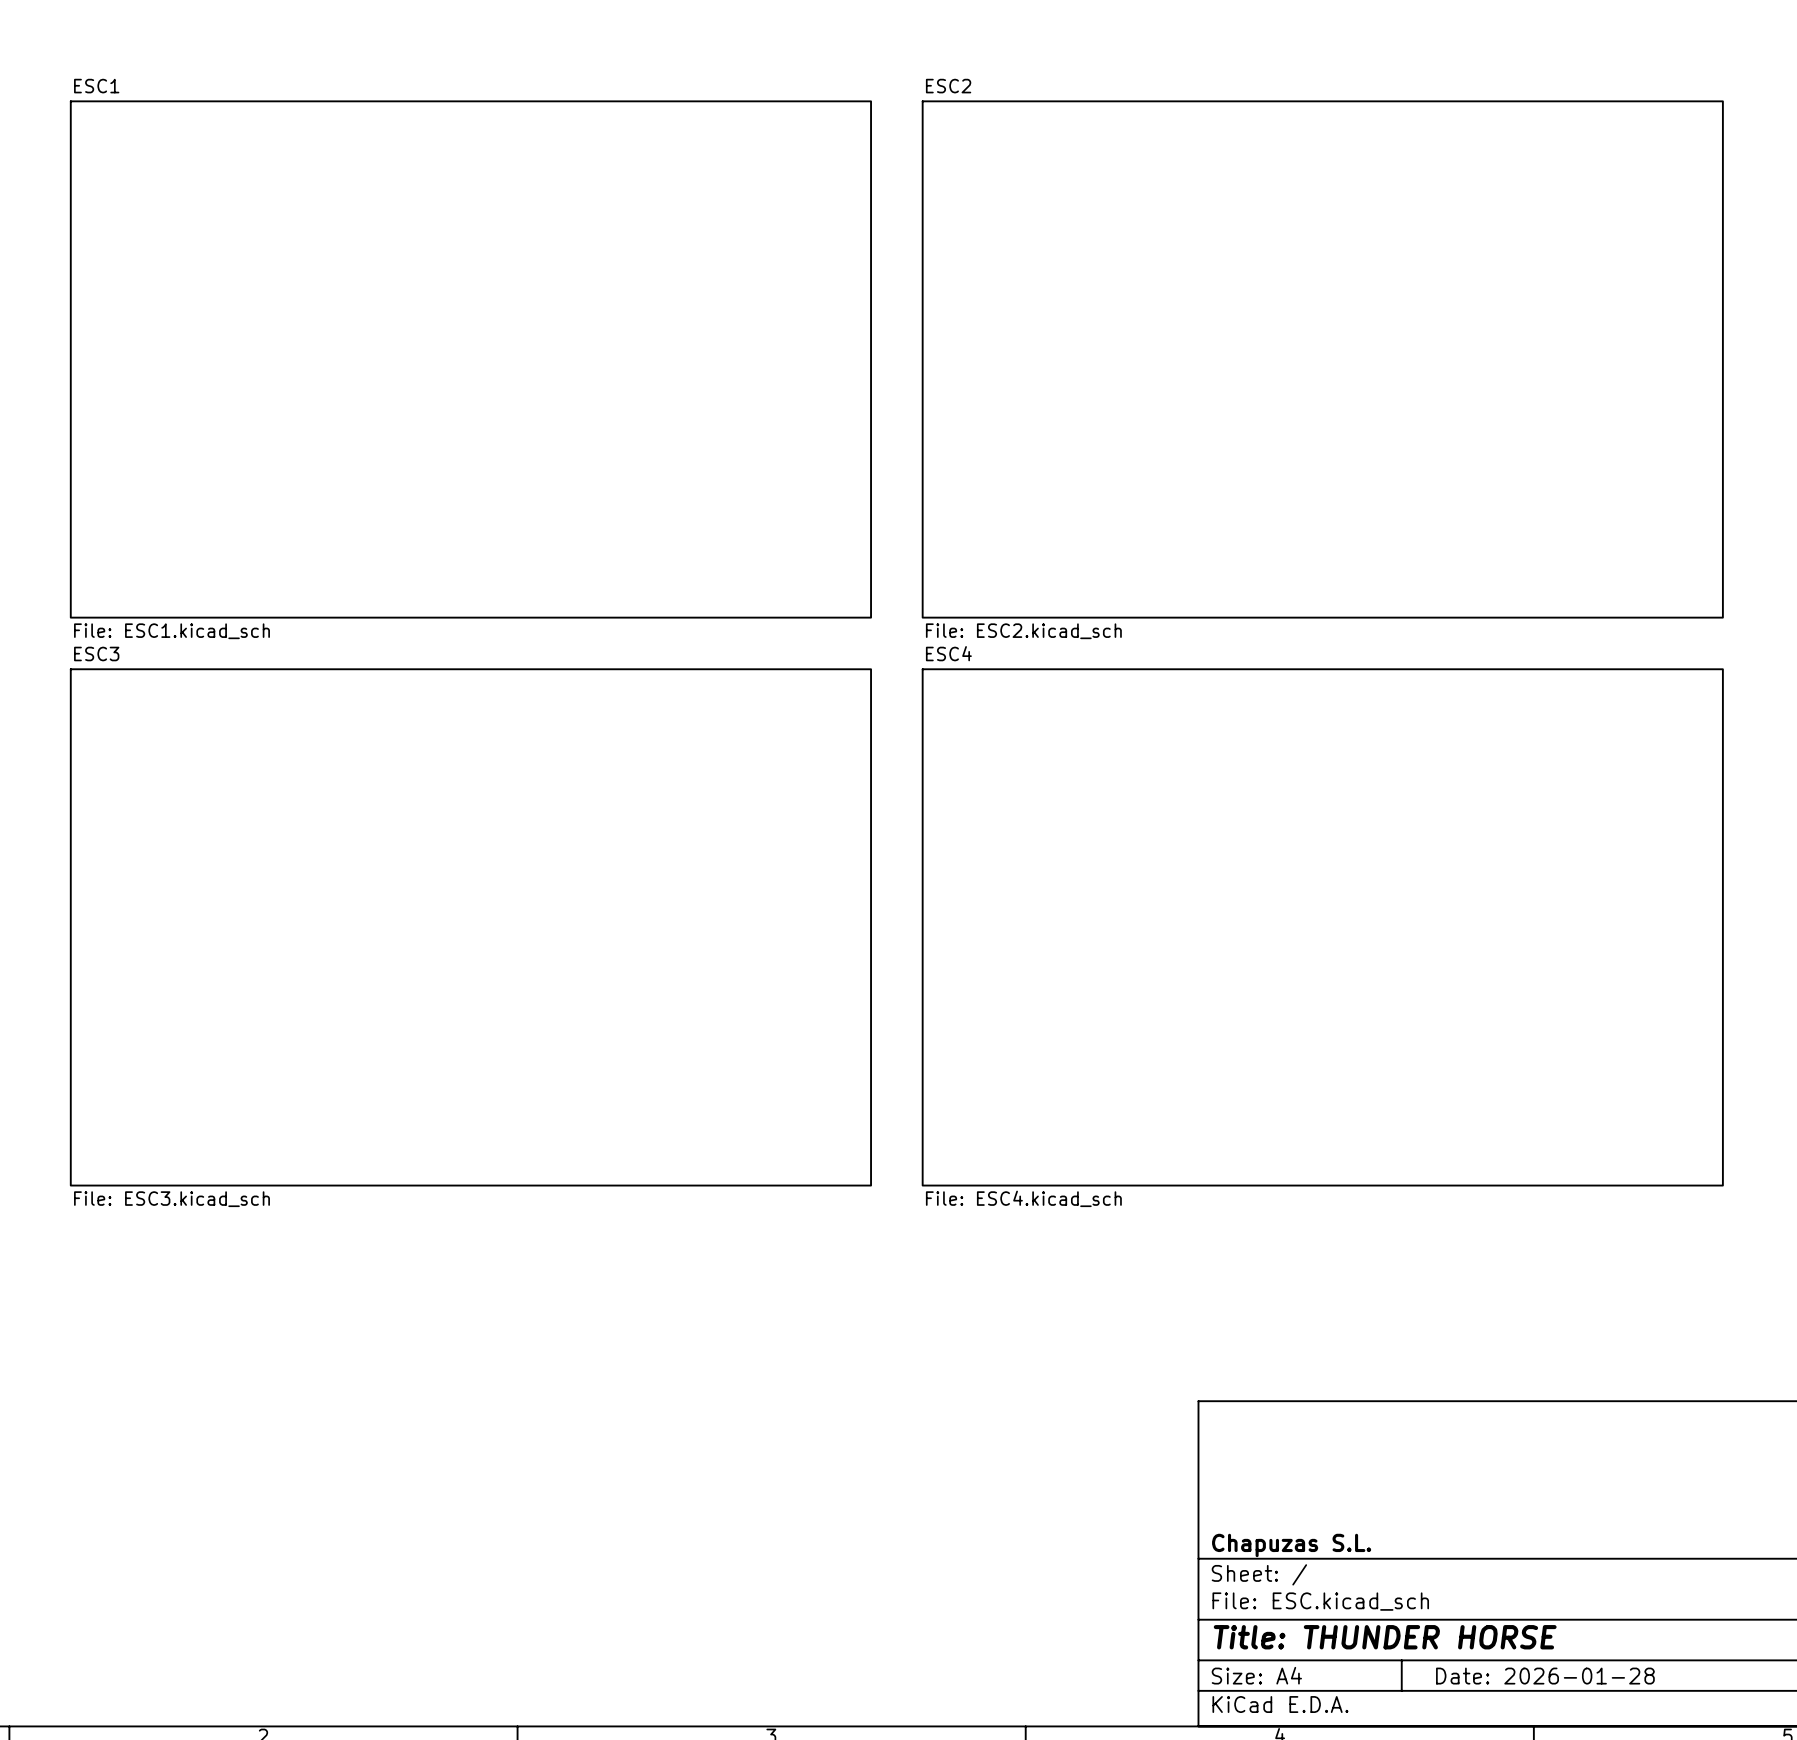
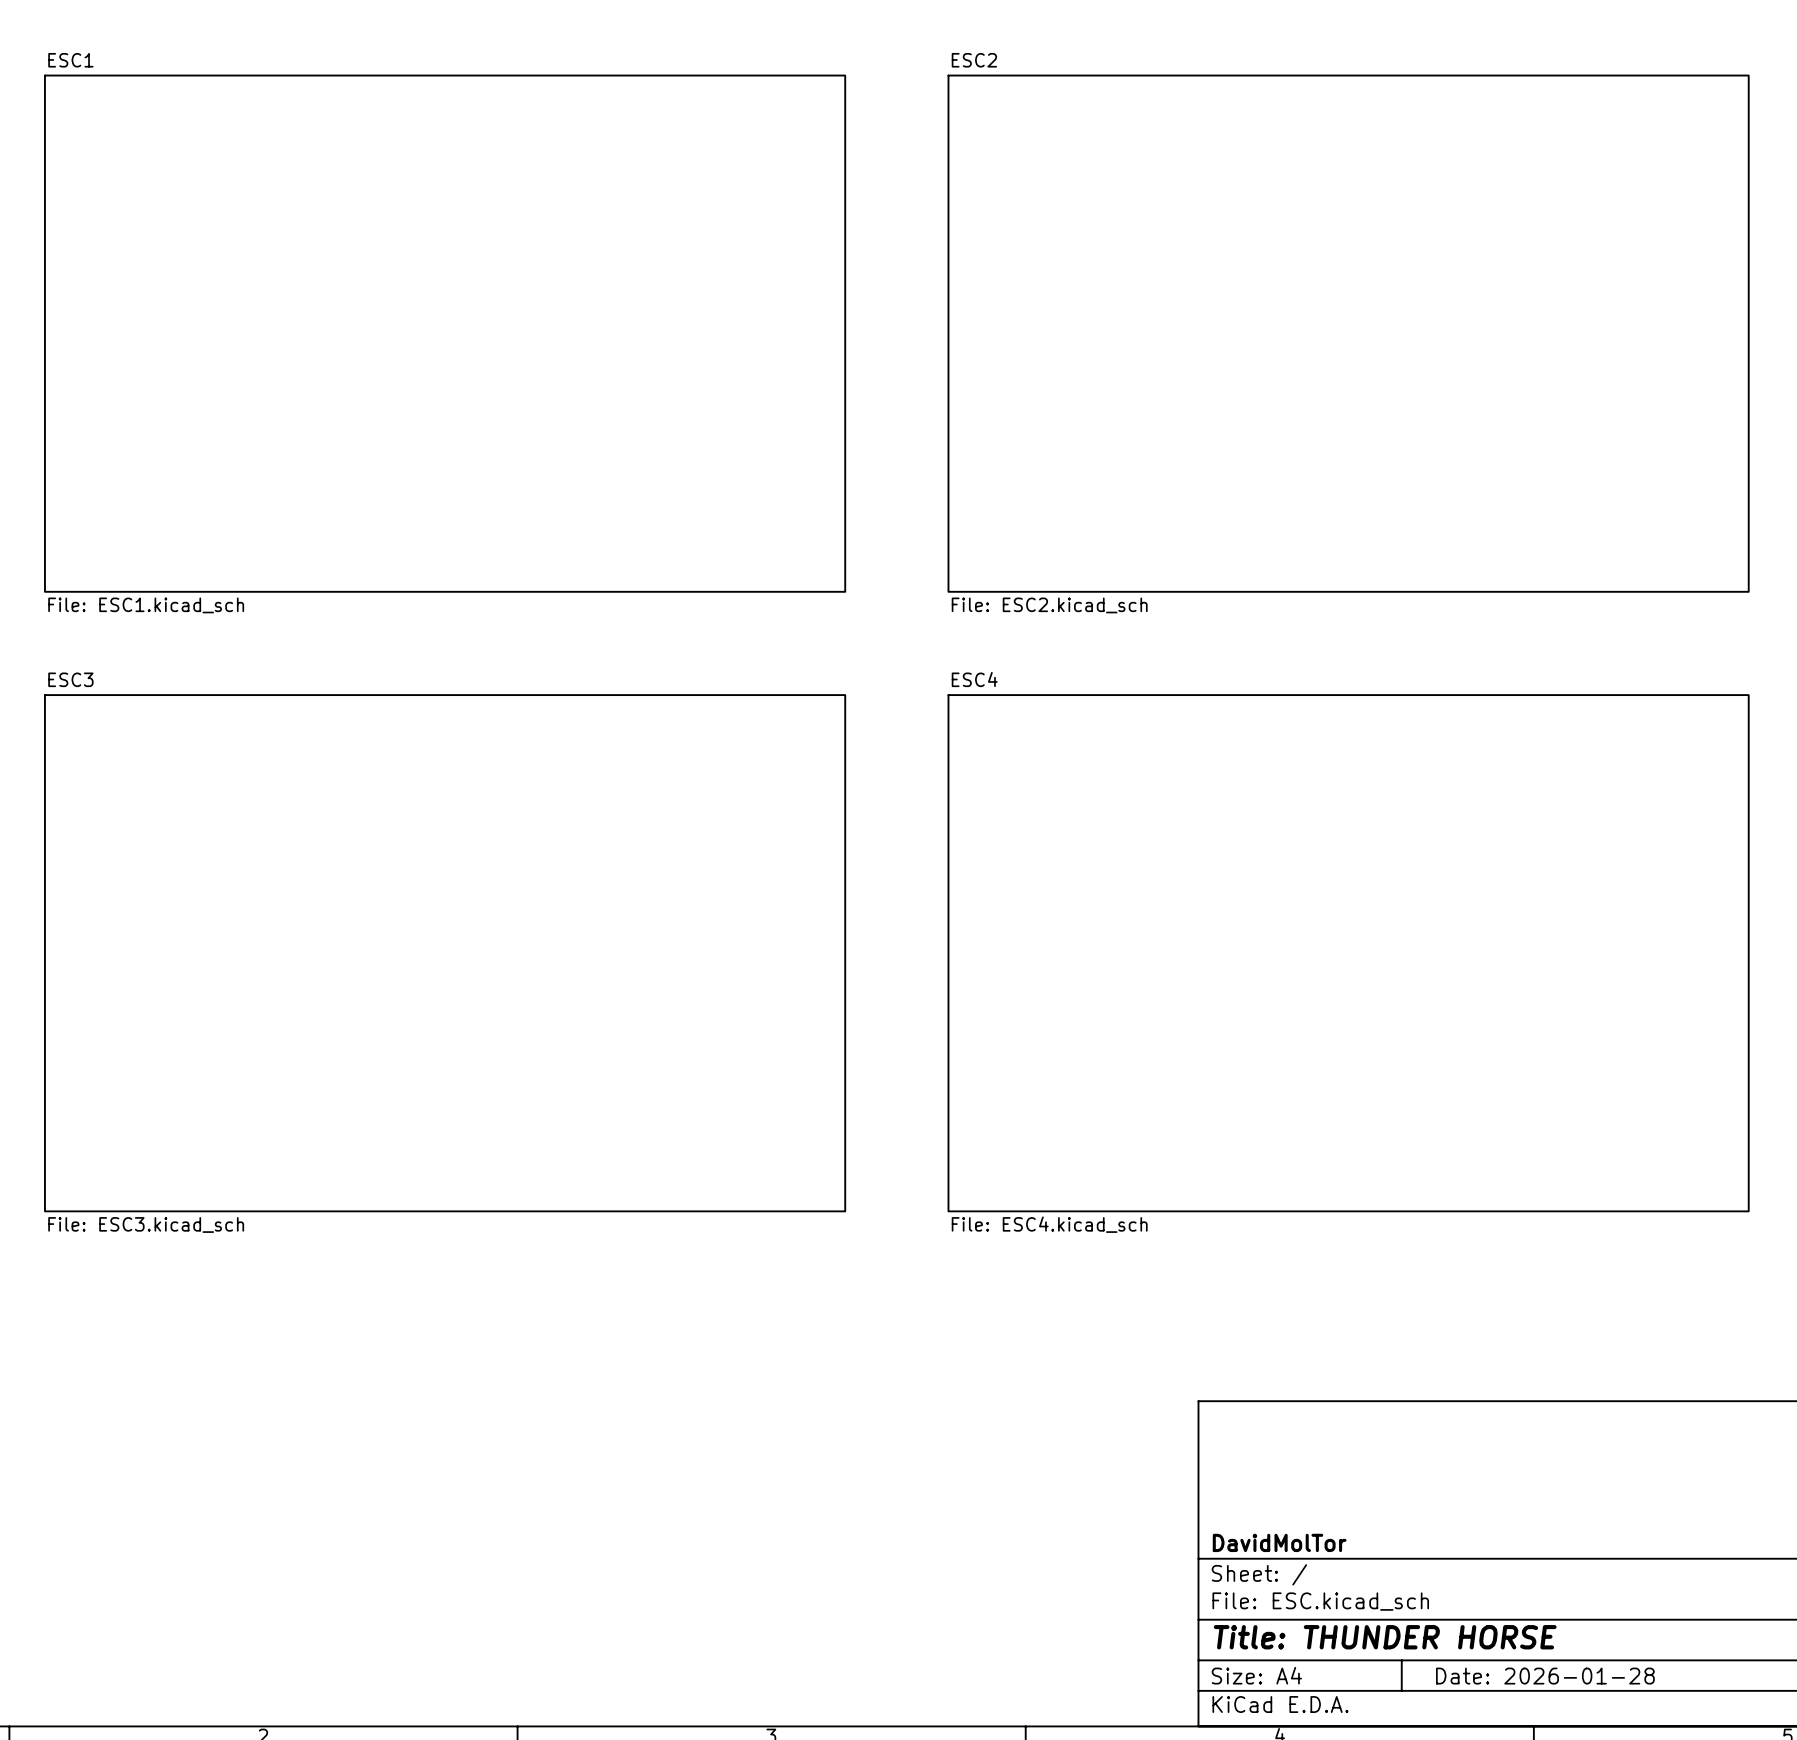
sheet ESC1 position: (470, 359) -> (445, 333)
sheet ESC2 position: (1322, 359) -> (1348, 333)
sheet ESC3 position: (470, 927) -> (445, 953)
sheet ESC4 position: (1322, 927) -> (1348, 953)
title block: Chapuzas S.L. (1291, 1545) -> DavidMolTor (1279, 1542)

